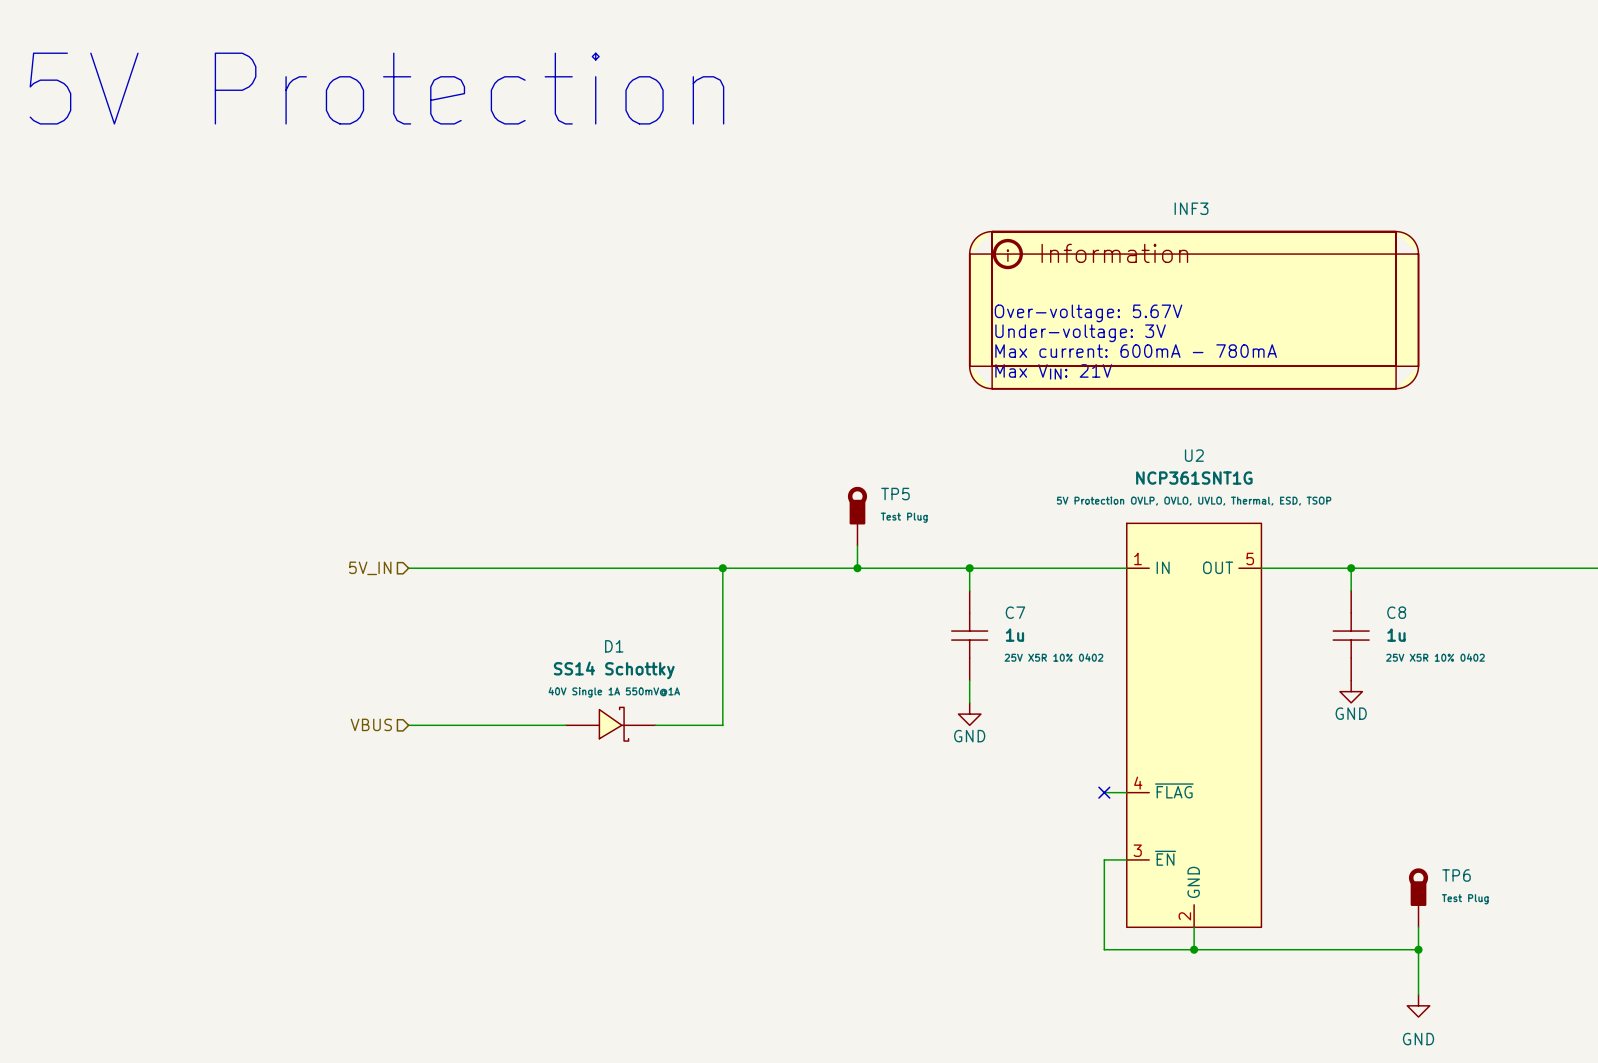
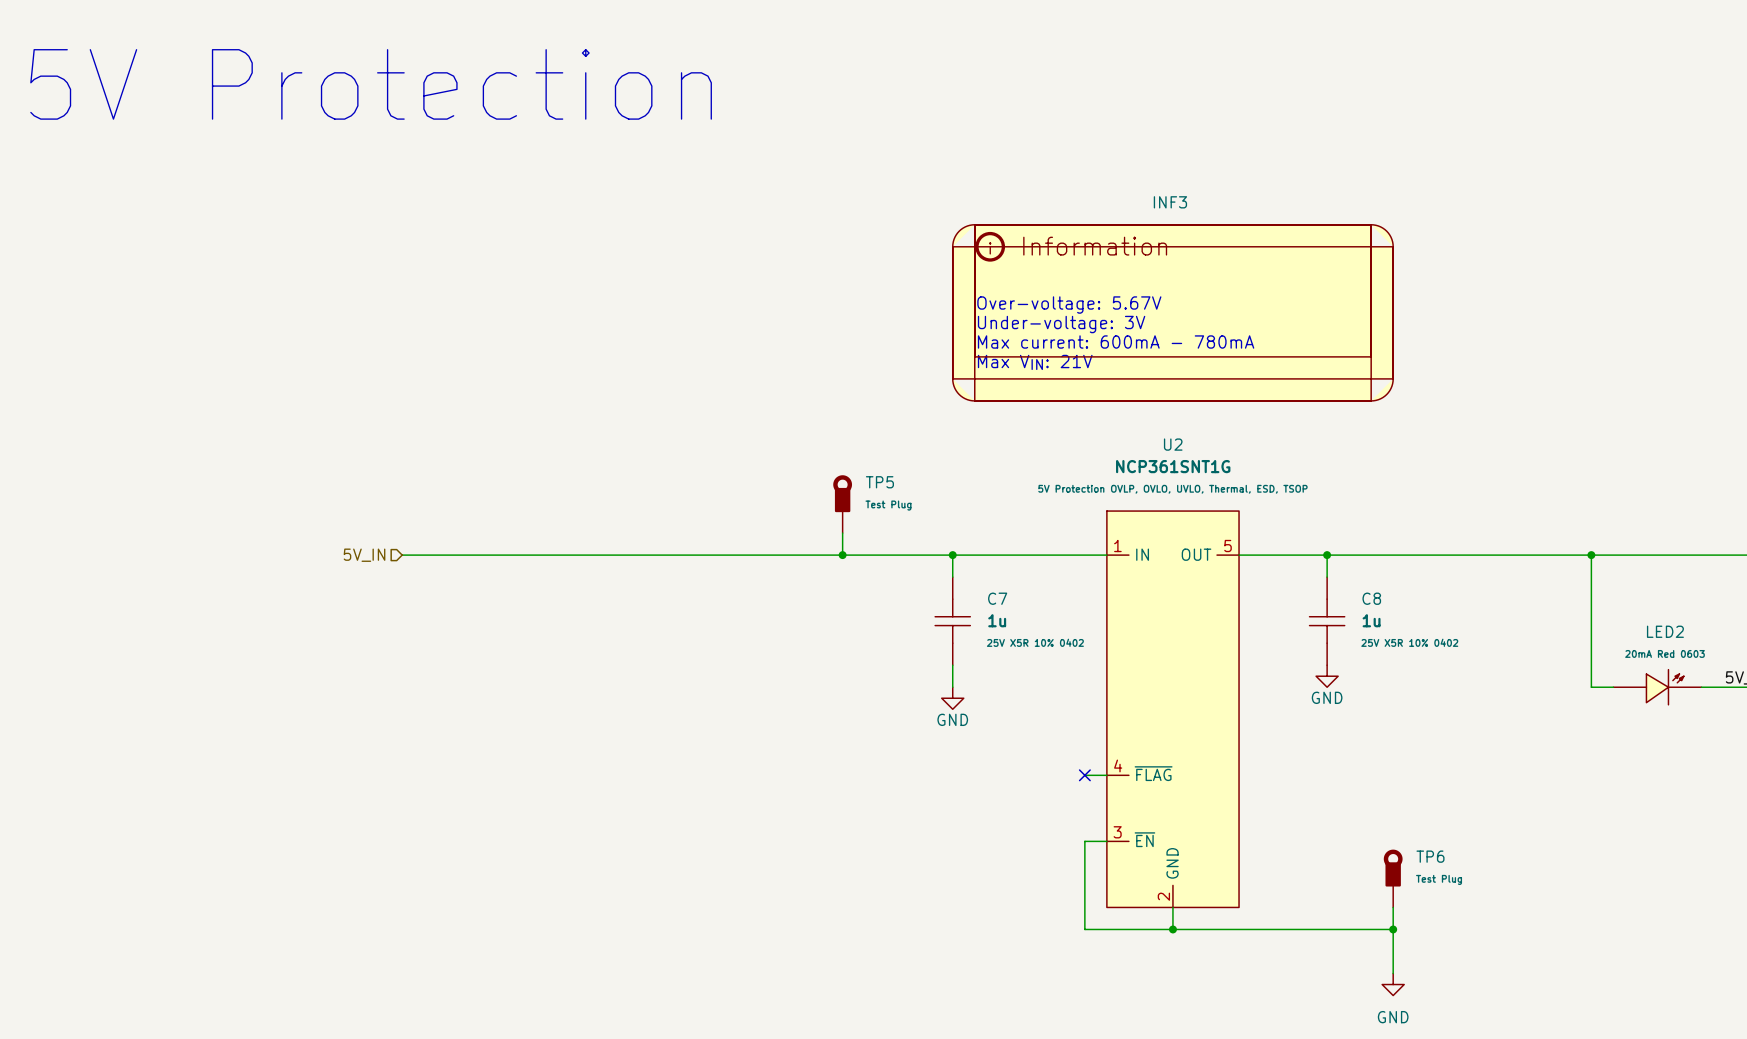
INF3 symbol: [969, 231, 1419, 389] -> [952, 224, 1394, 401]
wire: (722, 568) (722, 725) (655, 725) -> none
junction: (722, 568) -> none
hierarchical label: VBUS (371, 724) -> none
D1: SS14 Schottky (610, 724) -> none
wire: (408, 725) (565, 725) -> none

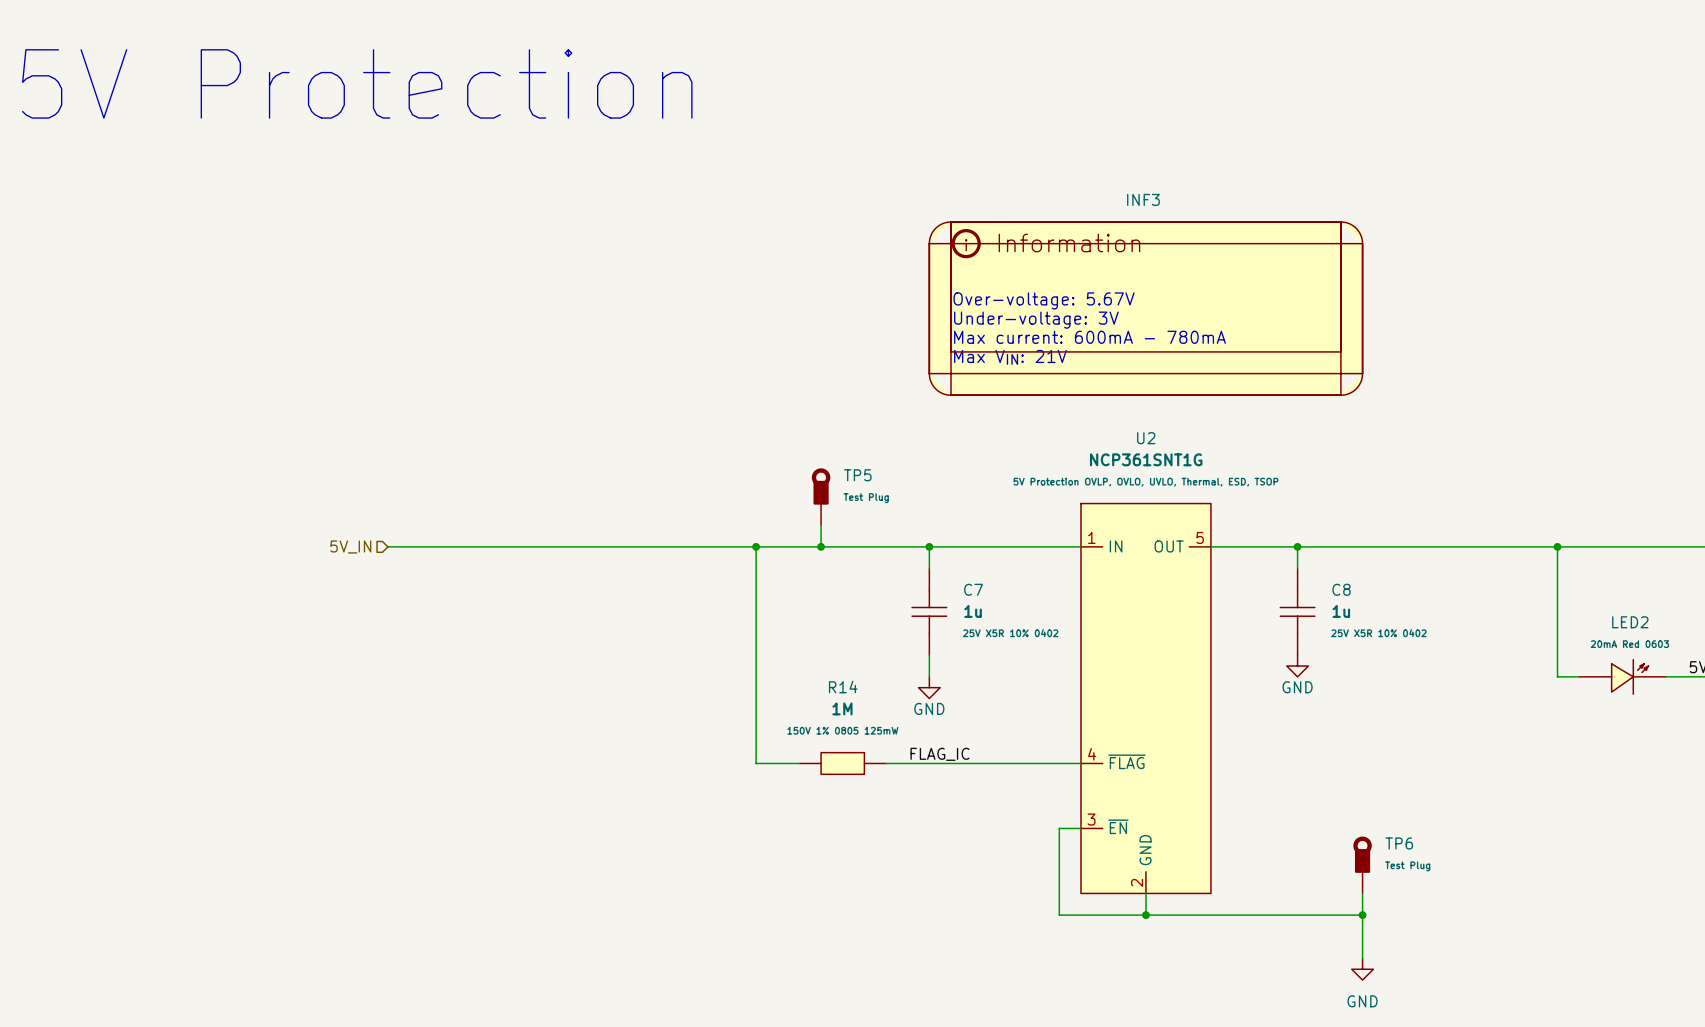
wire: none -> (756, 546) (756, 763) (799, 763)
junction: none -> (756, 546)
label: none -> FLAG_IC (940, 754)
R14: none -> 1M (842, 763)
wire: none -> (886, 763) (1059, 763)
no-connect mark: (1084, 775) -> none

